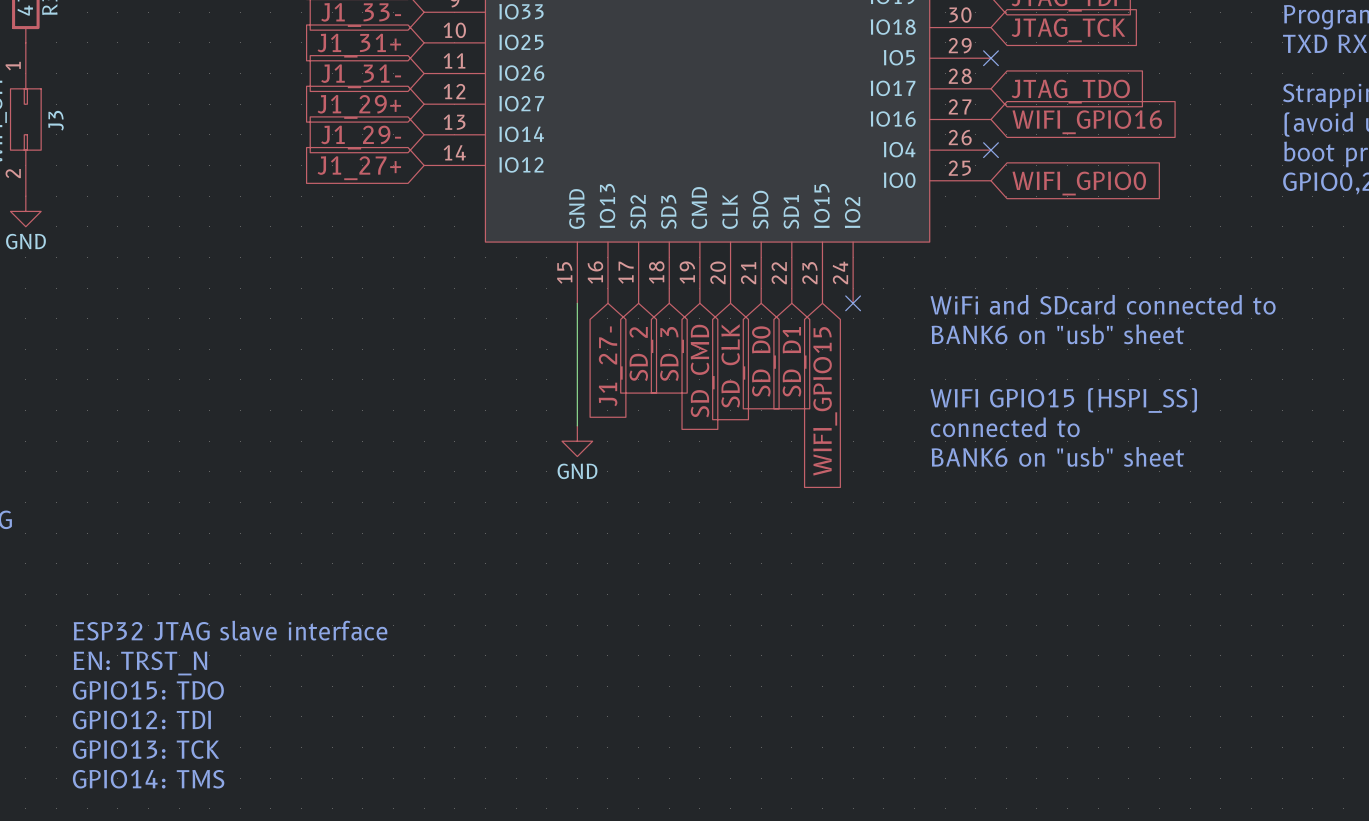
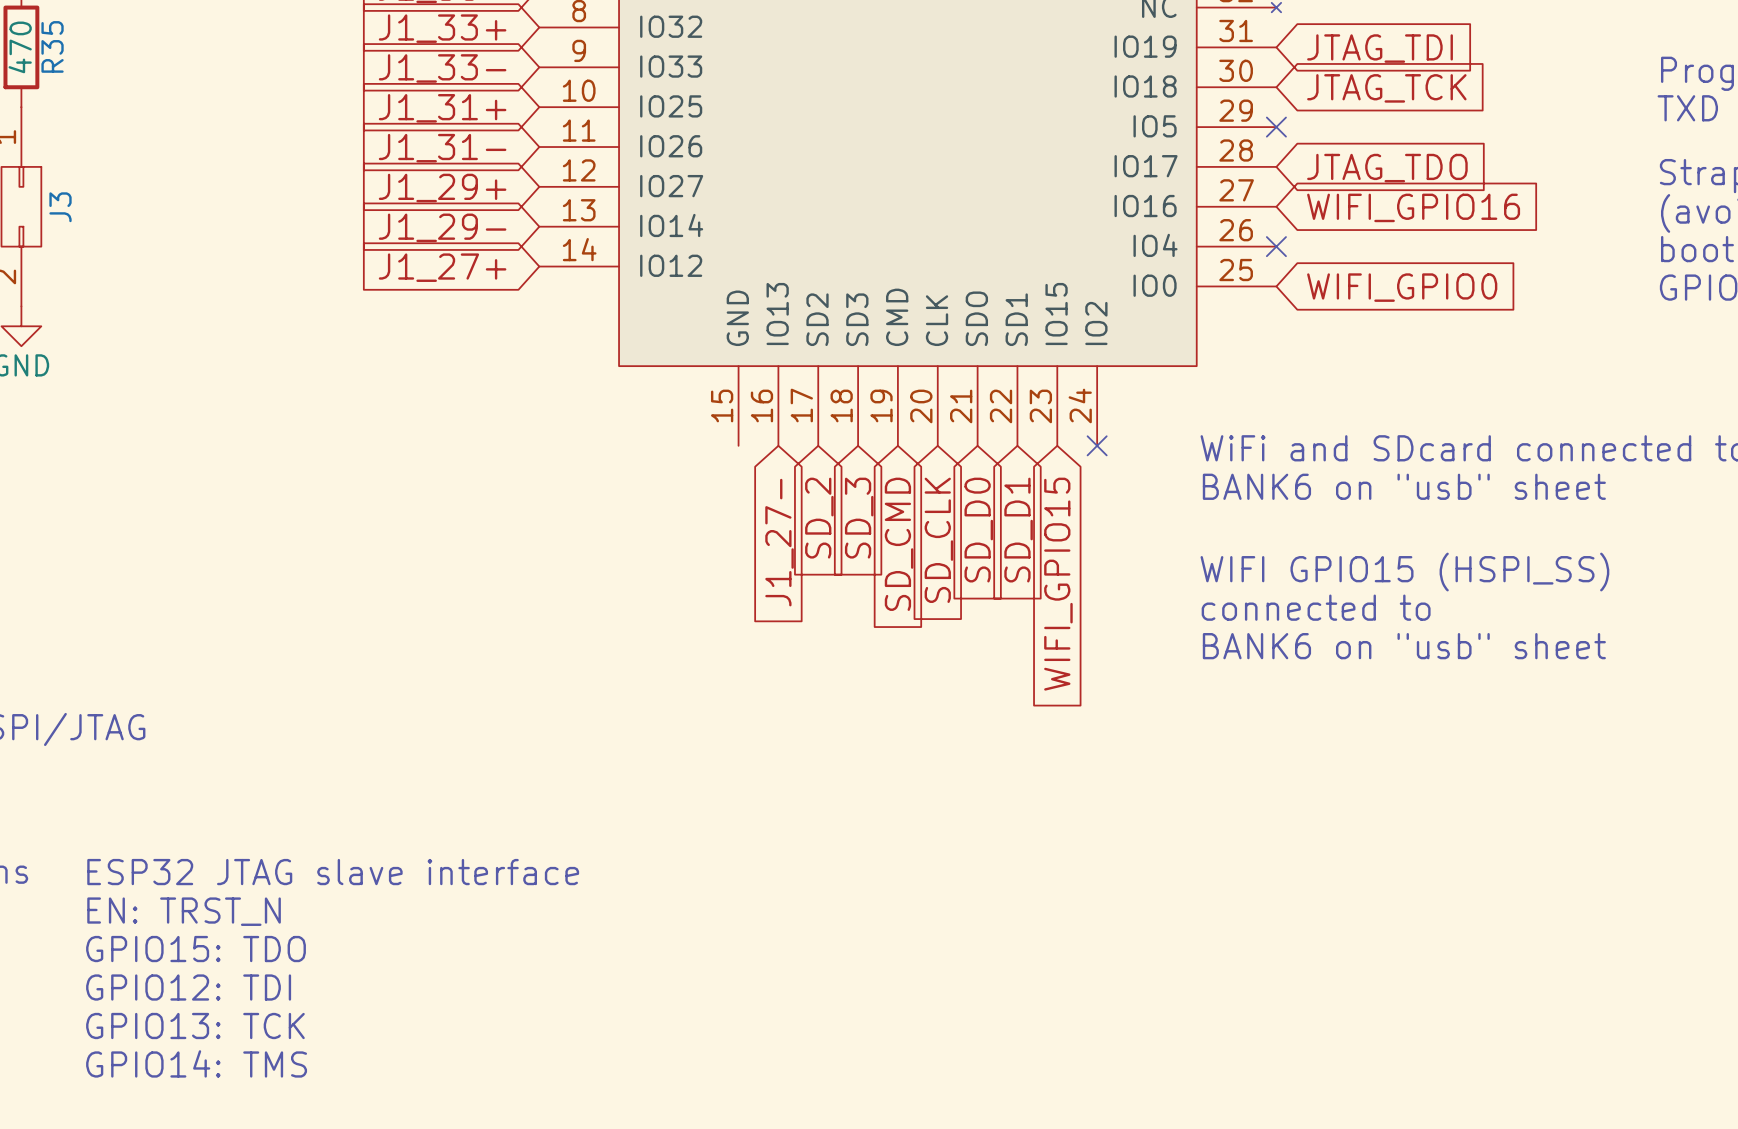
wire: (577, 303) (577, 425) -> none
power symbol: GND (577, 441) -> none

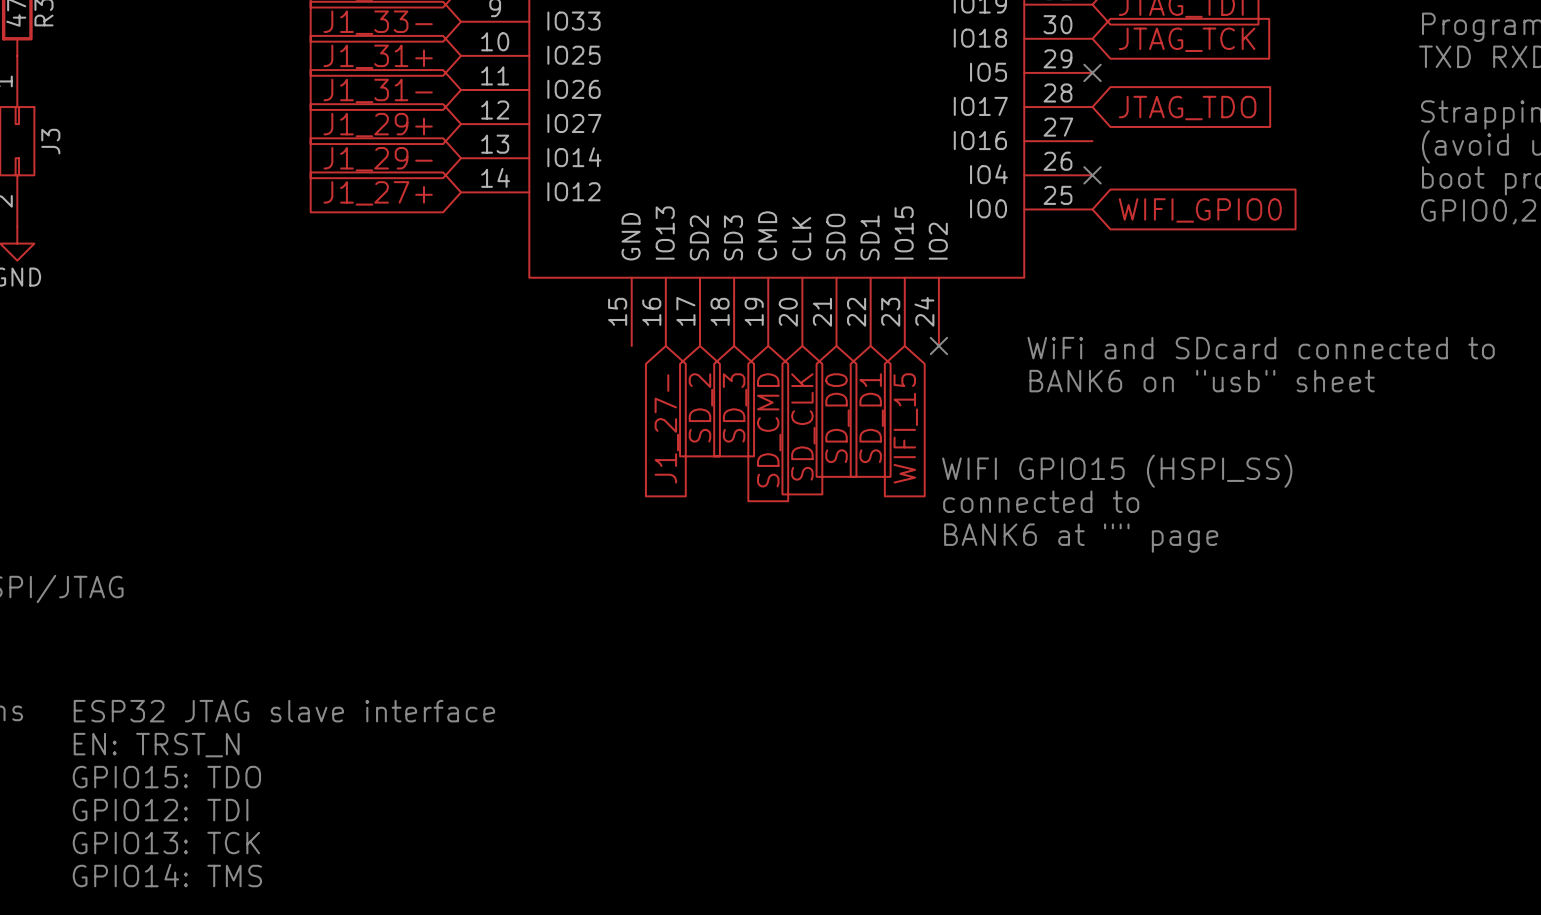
global label: WIFI_GPIO16 (1413, 207) -> none
text position: WIFI GPIO15 (HSPI_SS) (1404, 572) -> WIFI GPIO15 (HSPI_SS) (1117, 471)
global label: WIFI_GPIO15 (1058, 584) -> WIFI_15 (905, 428)
text position: connected to (1316, 607) -> connected to (1041, 501)
text: BANK6 on "usb" sheet (1404, 646) -> BANK6 at "" page (1081, 538)

